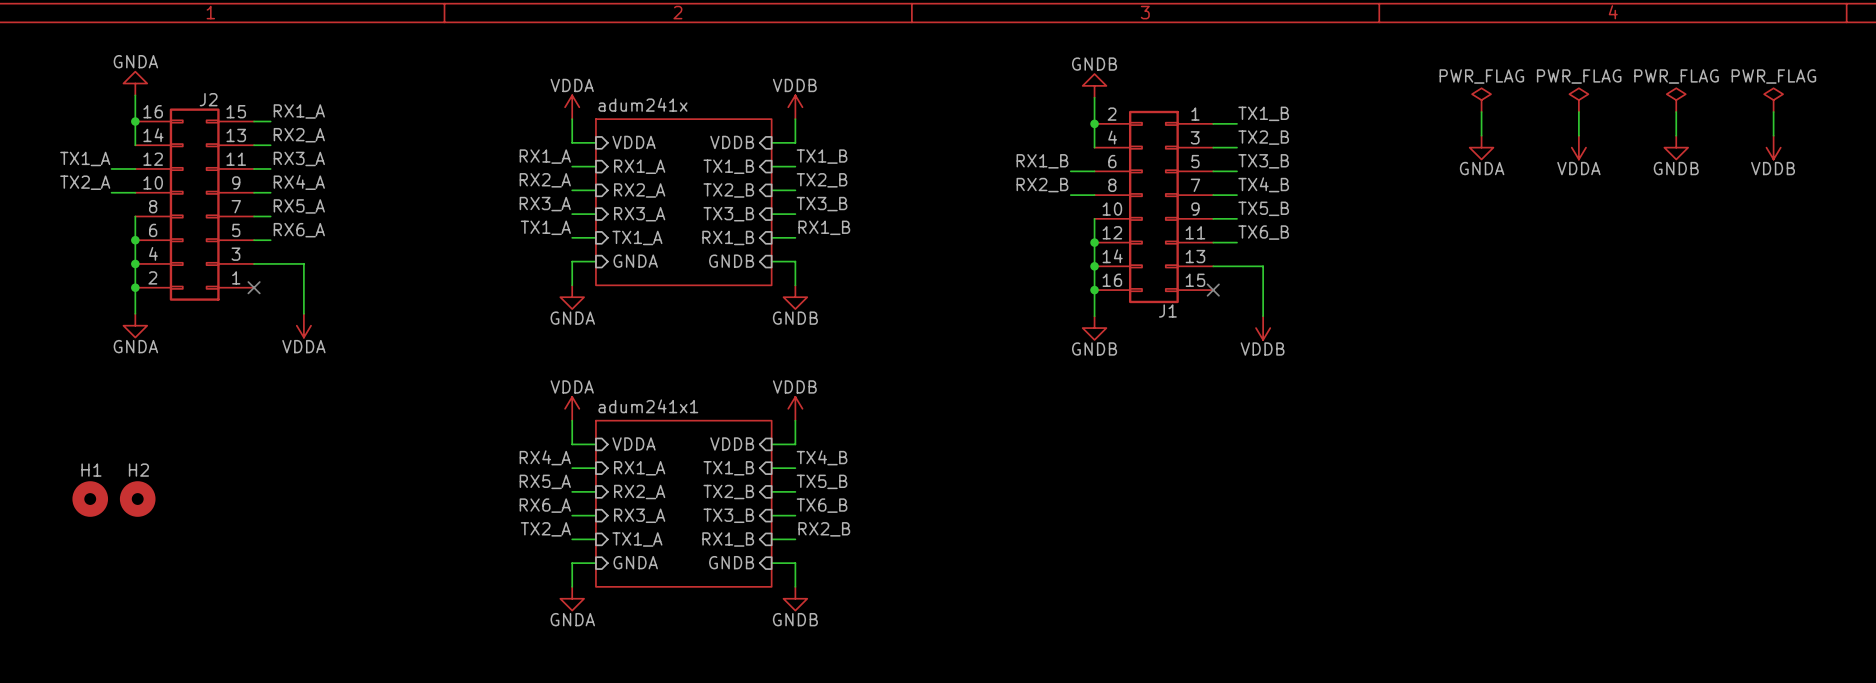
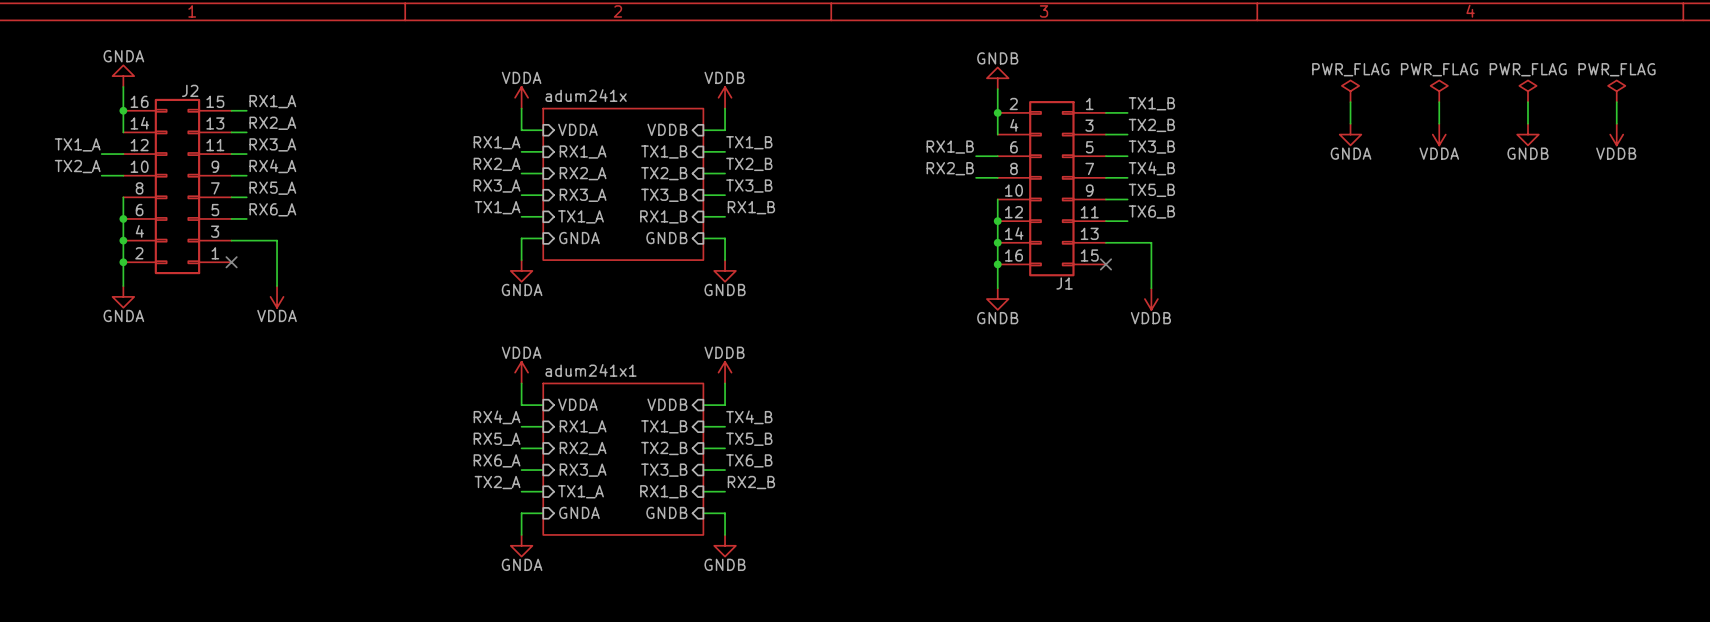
H1: (90, 499) -> none
H2: (137, 499) -> none

